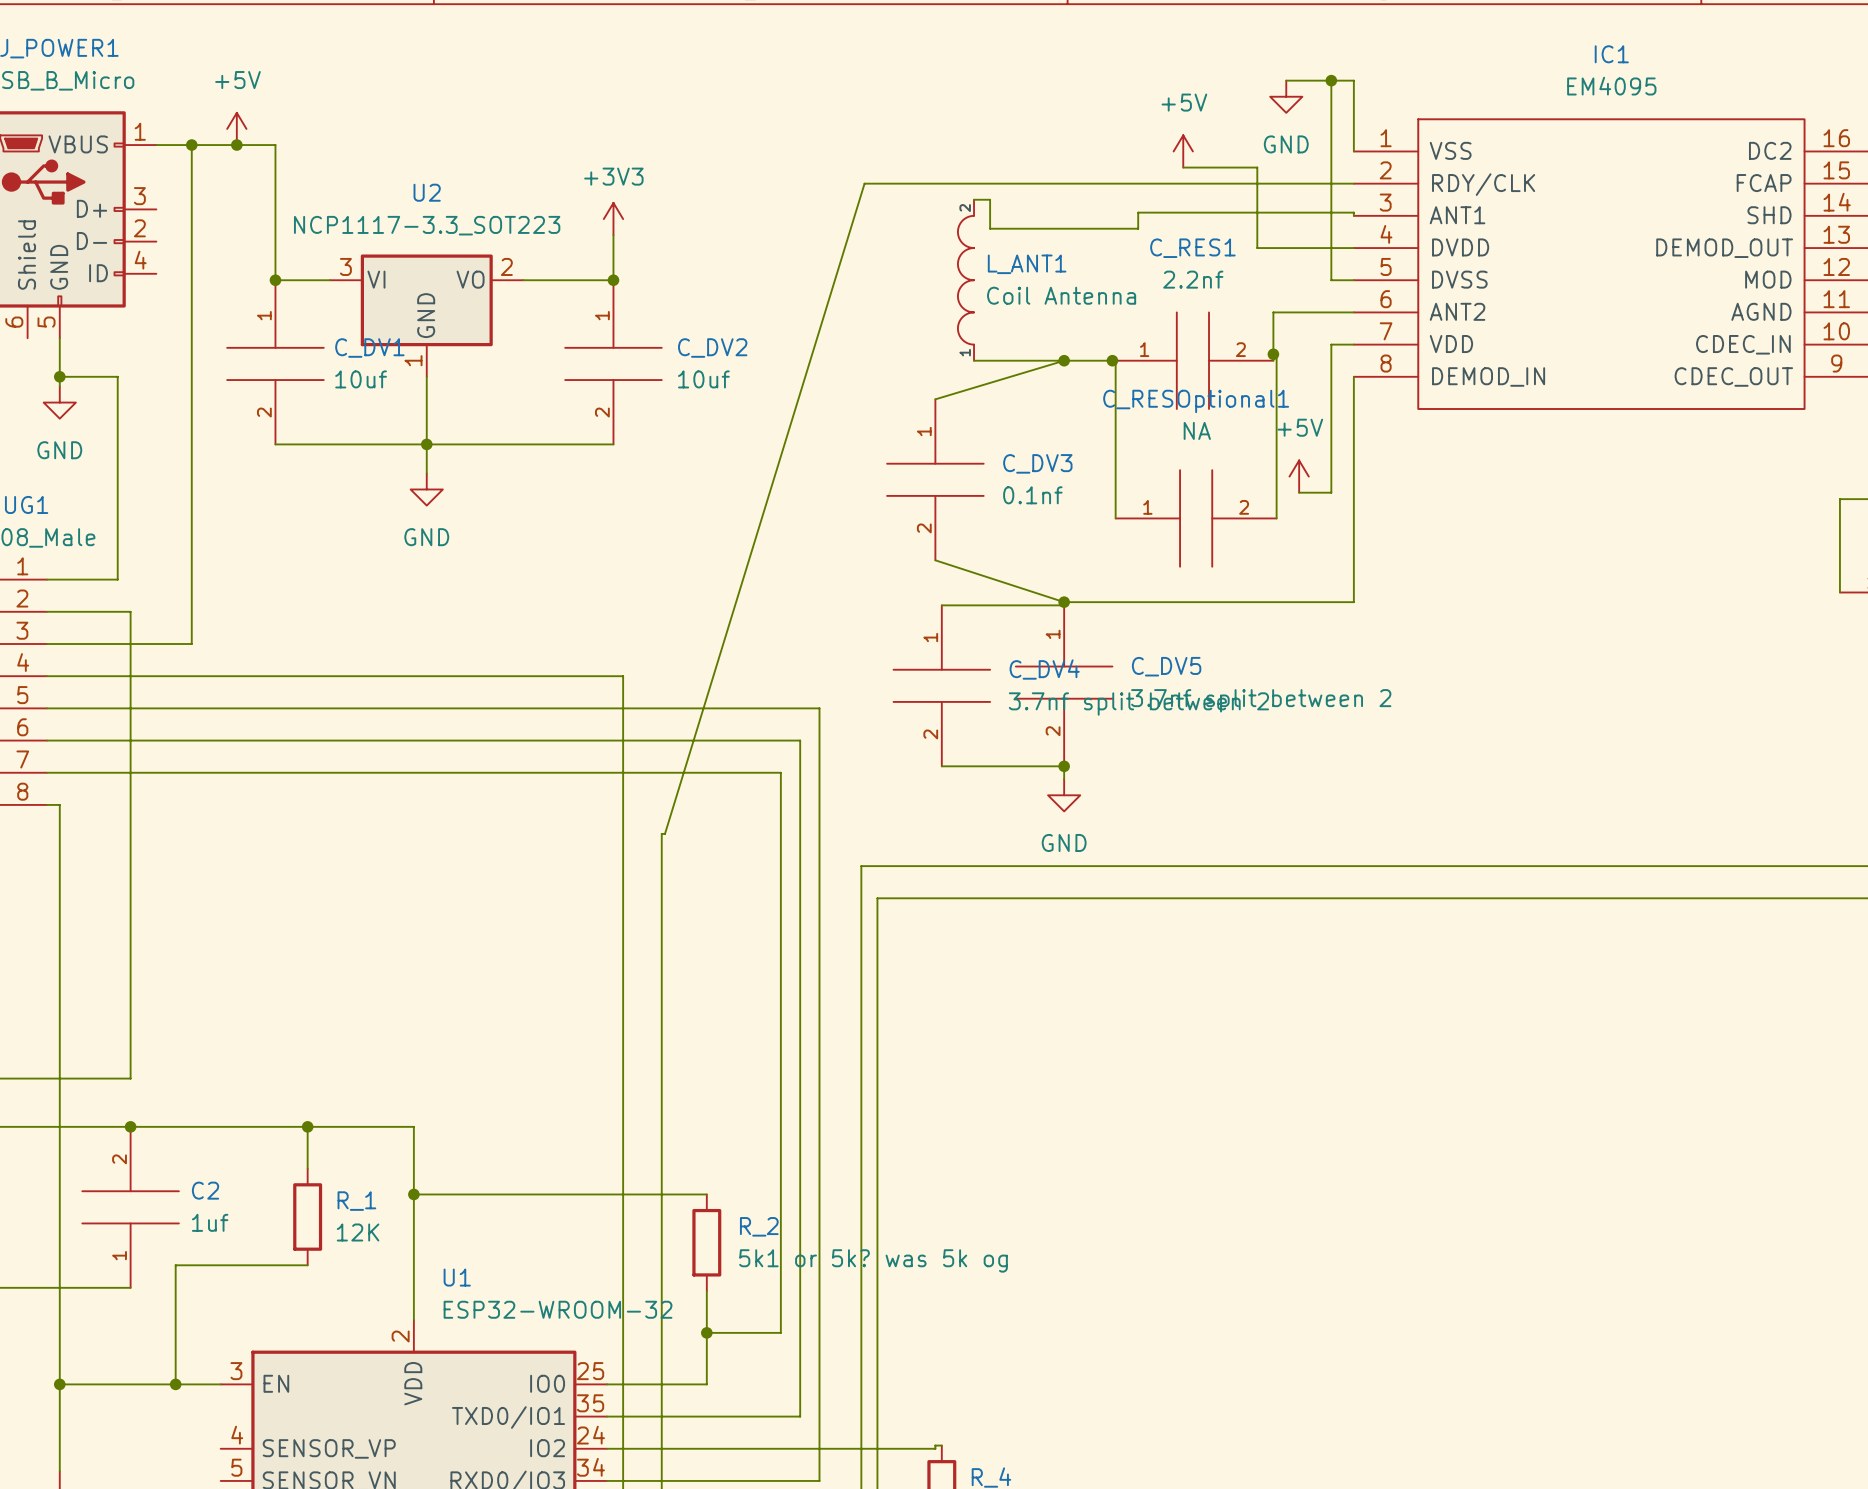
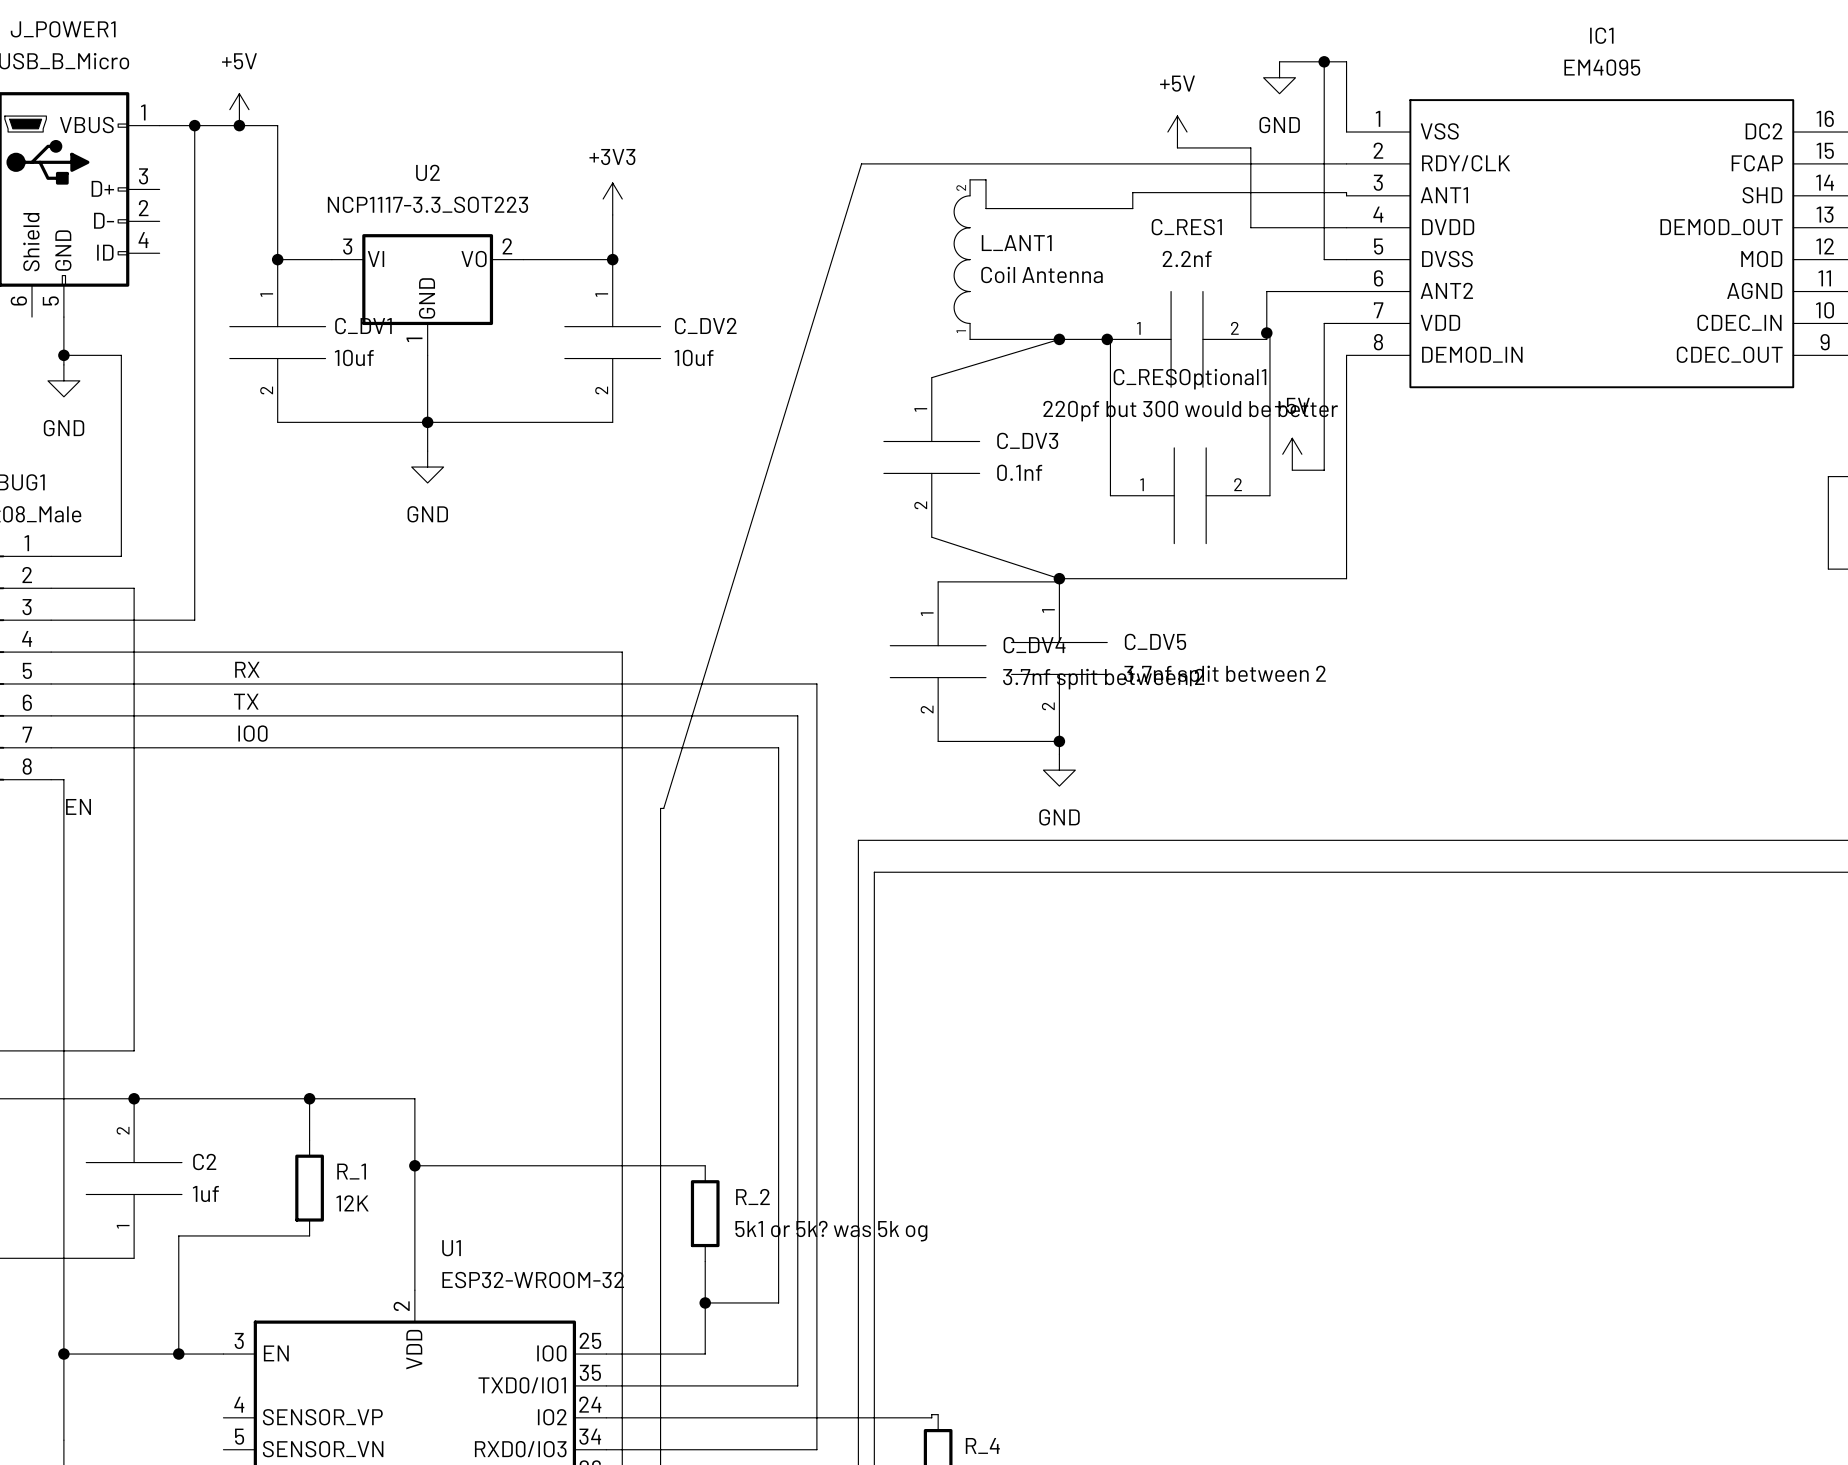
C_RESOptional1 value: NA (1197, 430) -> 220pf but 300 would be better (1190, 411)
label: none -> RX (247, 669)
label: none -> TX (246, 701)
label: none -> IO0 (252, 733)
label: none -> EN (78, 806)

